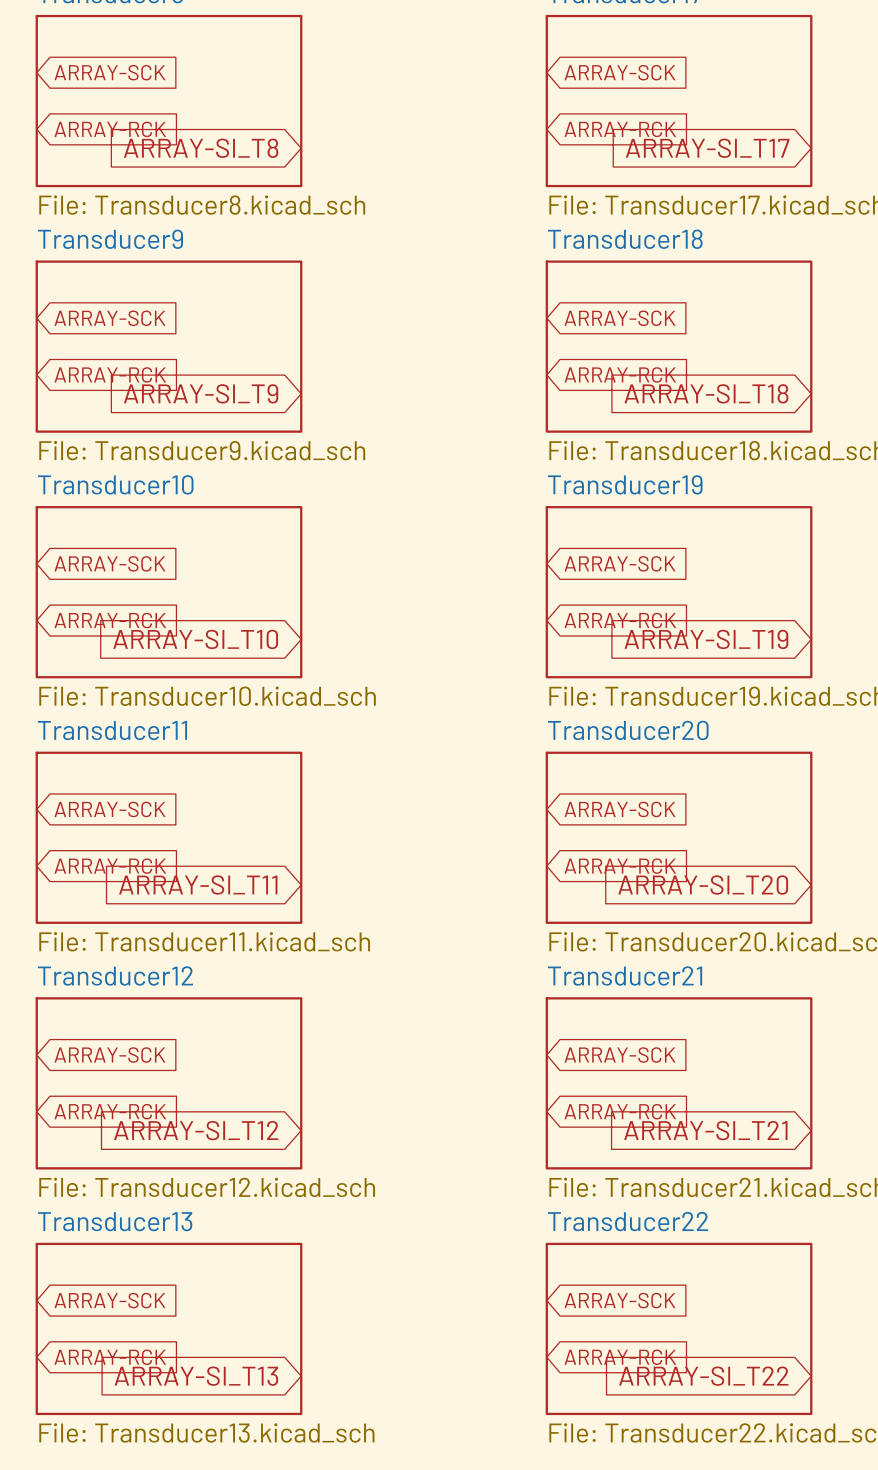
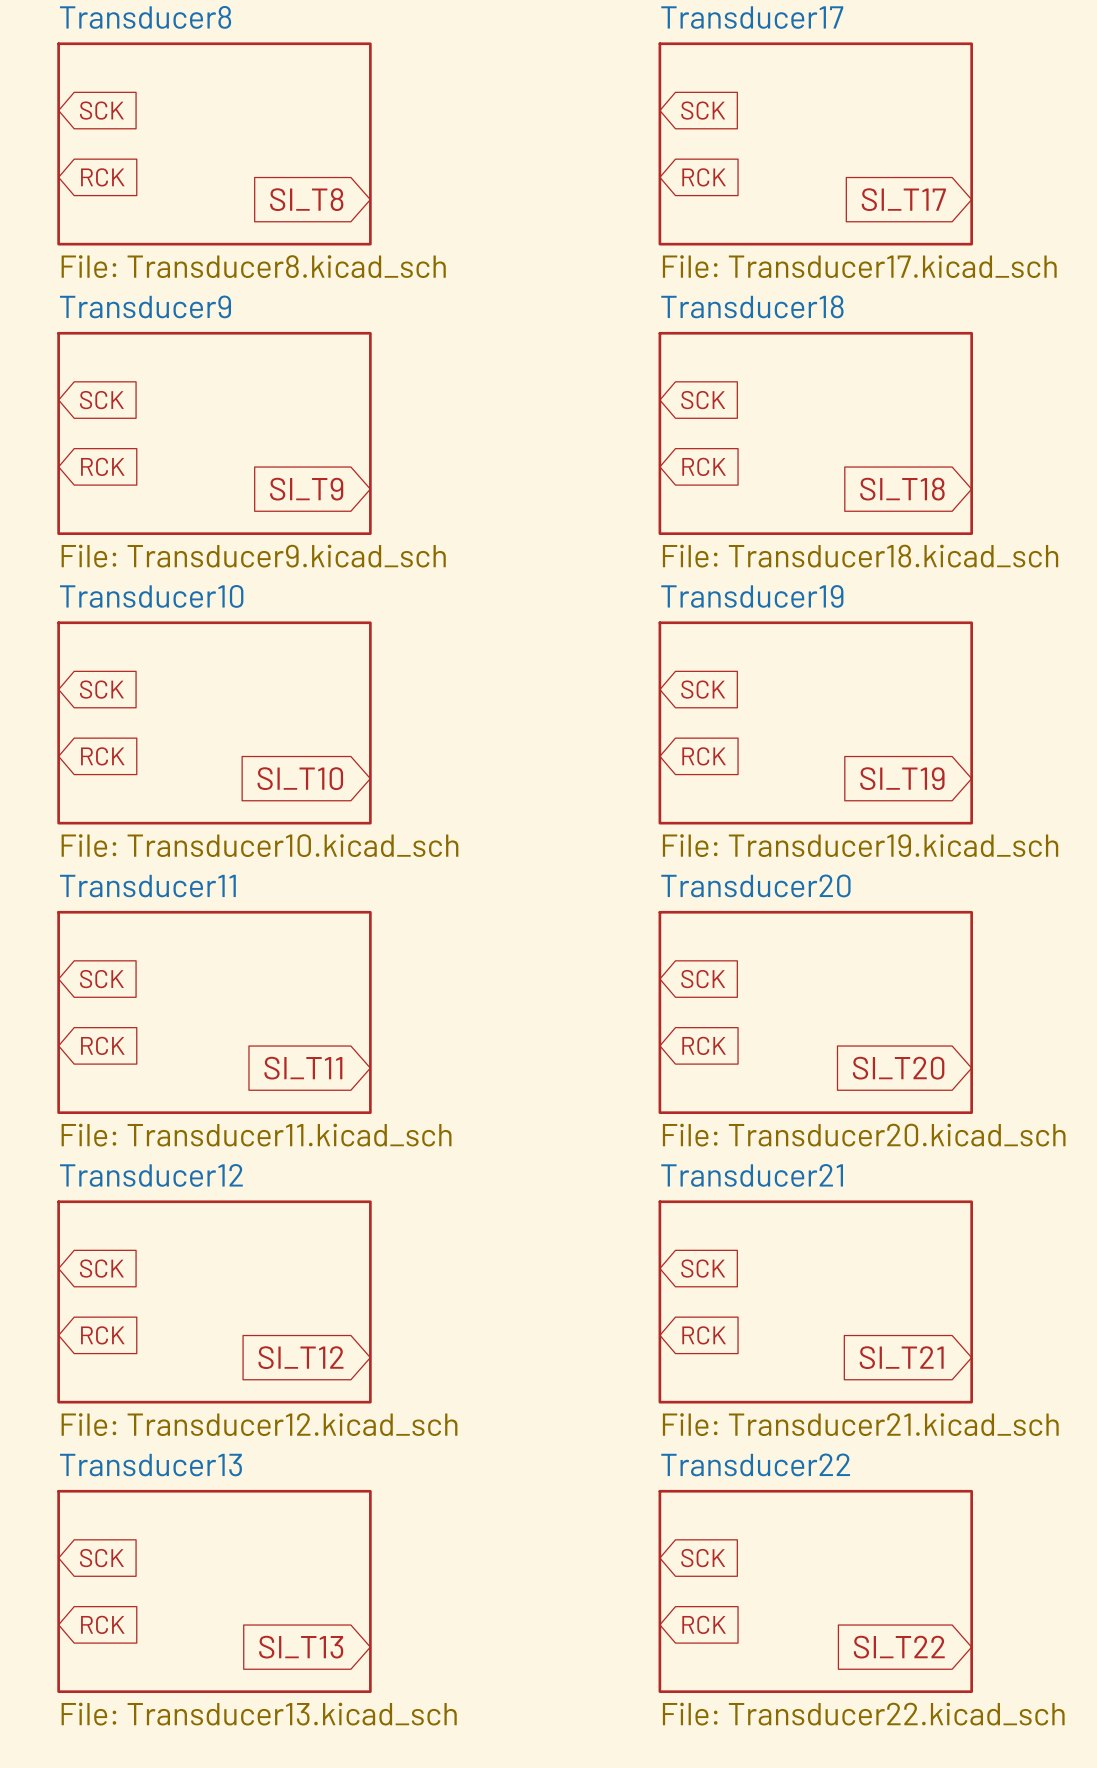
global label: ARRAY-SCK (109, 72) -> SCK (101, 110)
global label: ARRAY-SCK (620, 72) -> SCK (703, 110)
global label: ARRAY-RCK (110, 129) -> RCK (102, 177)
global label: ARRAY-RCK (620, 129) -> RCK (704, 177)
global label: ARRAY-SI_T8 (201, 148) -> SI_T8 (306, 199)
global label: ARRAY-SI_T17 (707, 148) -> SI_T17 (903, 199)
global label: ARRAY-SCK (109, 318) -> SCK (101, 400)
global label: ARRAY-SCK (620, 318) -> SCK (703, 400)
global label: ARRAY-RCK (110, 374) -> RCK (102, 466)
global label: ARRAY-RCK (620, 374) -> RCK (704, 466)
global label: ARRAY-SI_T9 (201, 393) -> SI_T9 (306, 489)
global label: ARRAY-SI_T18 (706, 393) -> SI_T18 (902, 489)
global label: ARRAY-SCK (109, 563) -> SCK (101, 689)
global label: ARRAY-SCK (620, 563) -> SCK (703, 689)
global label: ARRAY-RCK (110, 620) -> RCK (102, 756)
global label: ARRAY-RCK (620, 620) -> RCK (704, 756)
global label: ARRAY-SI_T10 (195, 639) -> SI_T10 (300, 778)
global label: ARRAY-SI_T19 (706, 639) -> SI_T19 (902, 778)
global label: ARRAY-SCK (109, 809) -> SCK (101, 979)
global label: ARRAY-SCK (620, 809) -> SCK (703, 979)
global label: ARRAY-RCK (110, 866) -> RCK (102, 1045)
global label: ARRAY-RCK (620, 866) -> RCK (704, 1045)
global label: ARRAY-SI_T11 (198, 885) -> SI_T11 (303, 1068)
global label: ARRAY-SI_T20 (703, 885) -> SI_T20 (898, 1068)
global label: ARRAY-SCK (109, 1055) -> SCK (101, 1268)
global label: ARRAY-SCK (620, 1055) -> SCK (703, 1268)
global label: ARRAY-RCK (110, 1111) -> RCK (102, 1335)
global label: ARRAY-RCK (620, 1111) -> RCK (704, 1335)
global label: ARRAY-SI_T12 (196, 1130) -> SI_T12 (300, 1357)
global label: ARRAY-SI_T21 (705, 1130) -> SI_T21 (901, 1357)
global label: ARRAY-SCK (109, 1300) -> SCK (101, 1558)
global label: ARRAY-SCK (620, 1300) -> SCK (703, 1558)
global label: ARRAY-RCK (110, 1357) -> RCK (102, 1624)
global label: ARRAY-RCK (620, 1357) -> RCK (704, 1624)
global label: ARRAY-SI_T13 (196, 1376) -> SI_T13 (301, 1647)
global label: ARRAY-SI_T22 (703, 1376) -> SI_T22 (899, 1647)

